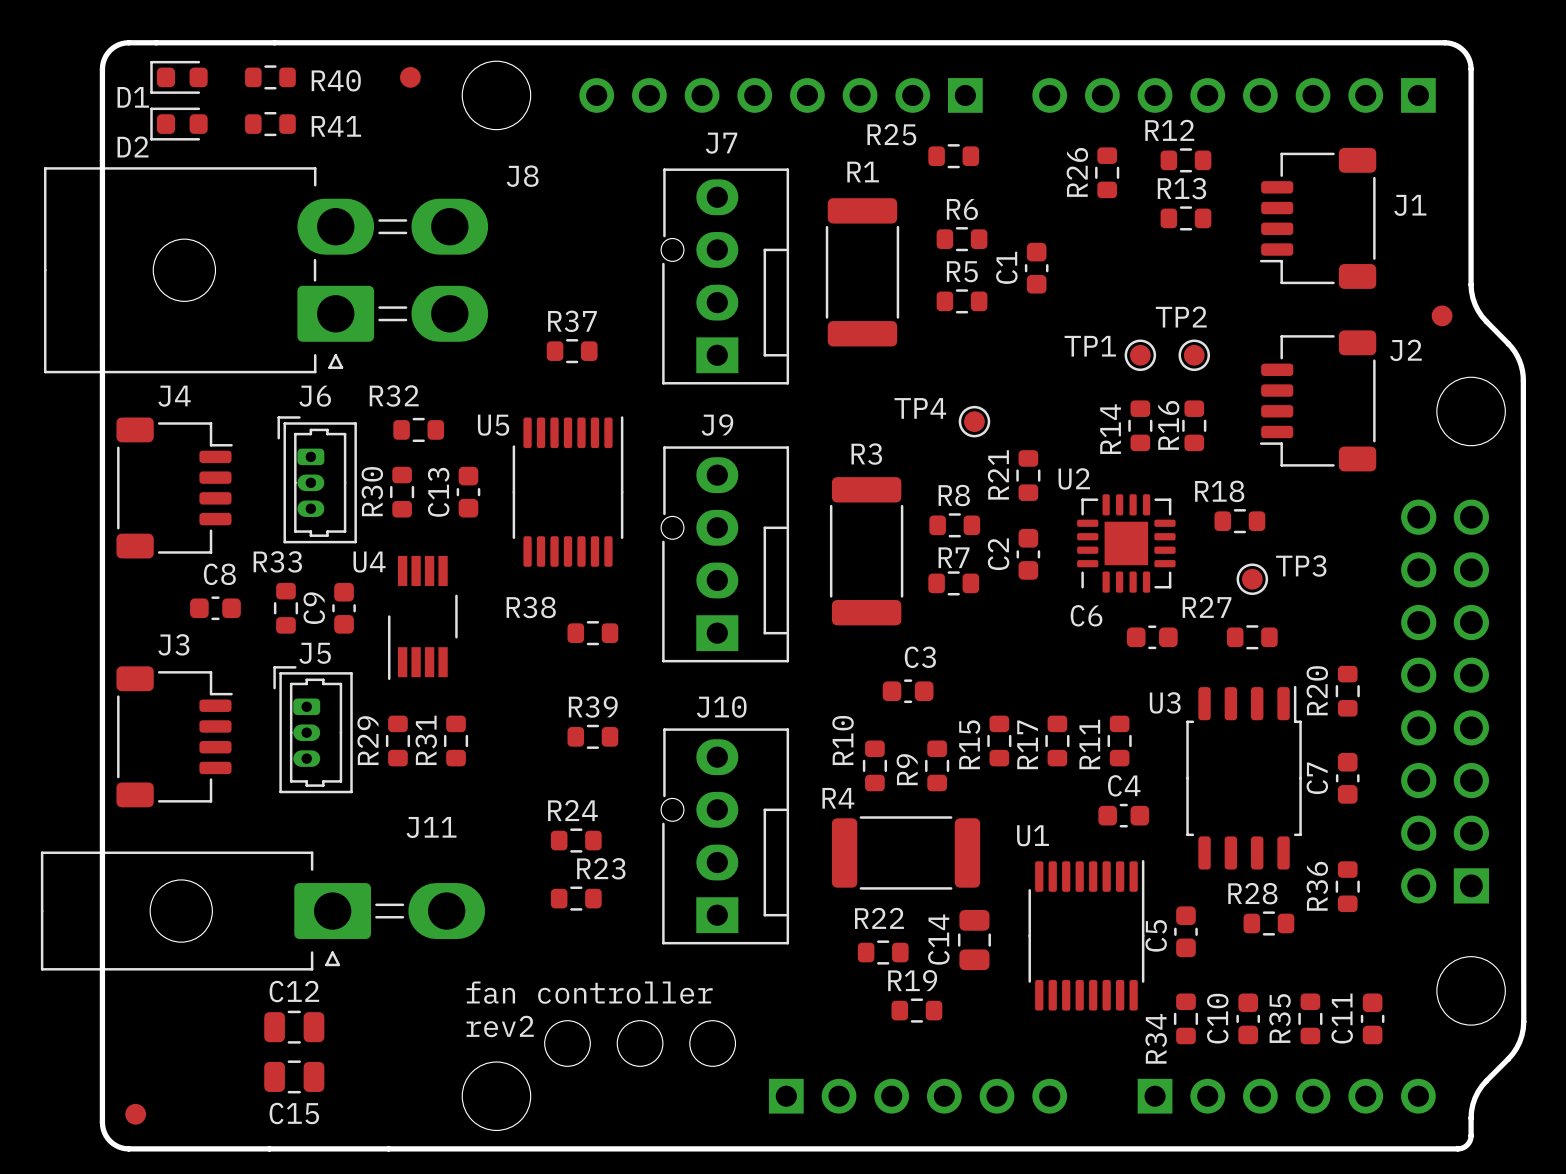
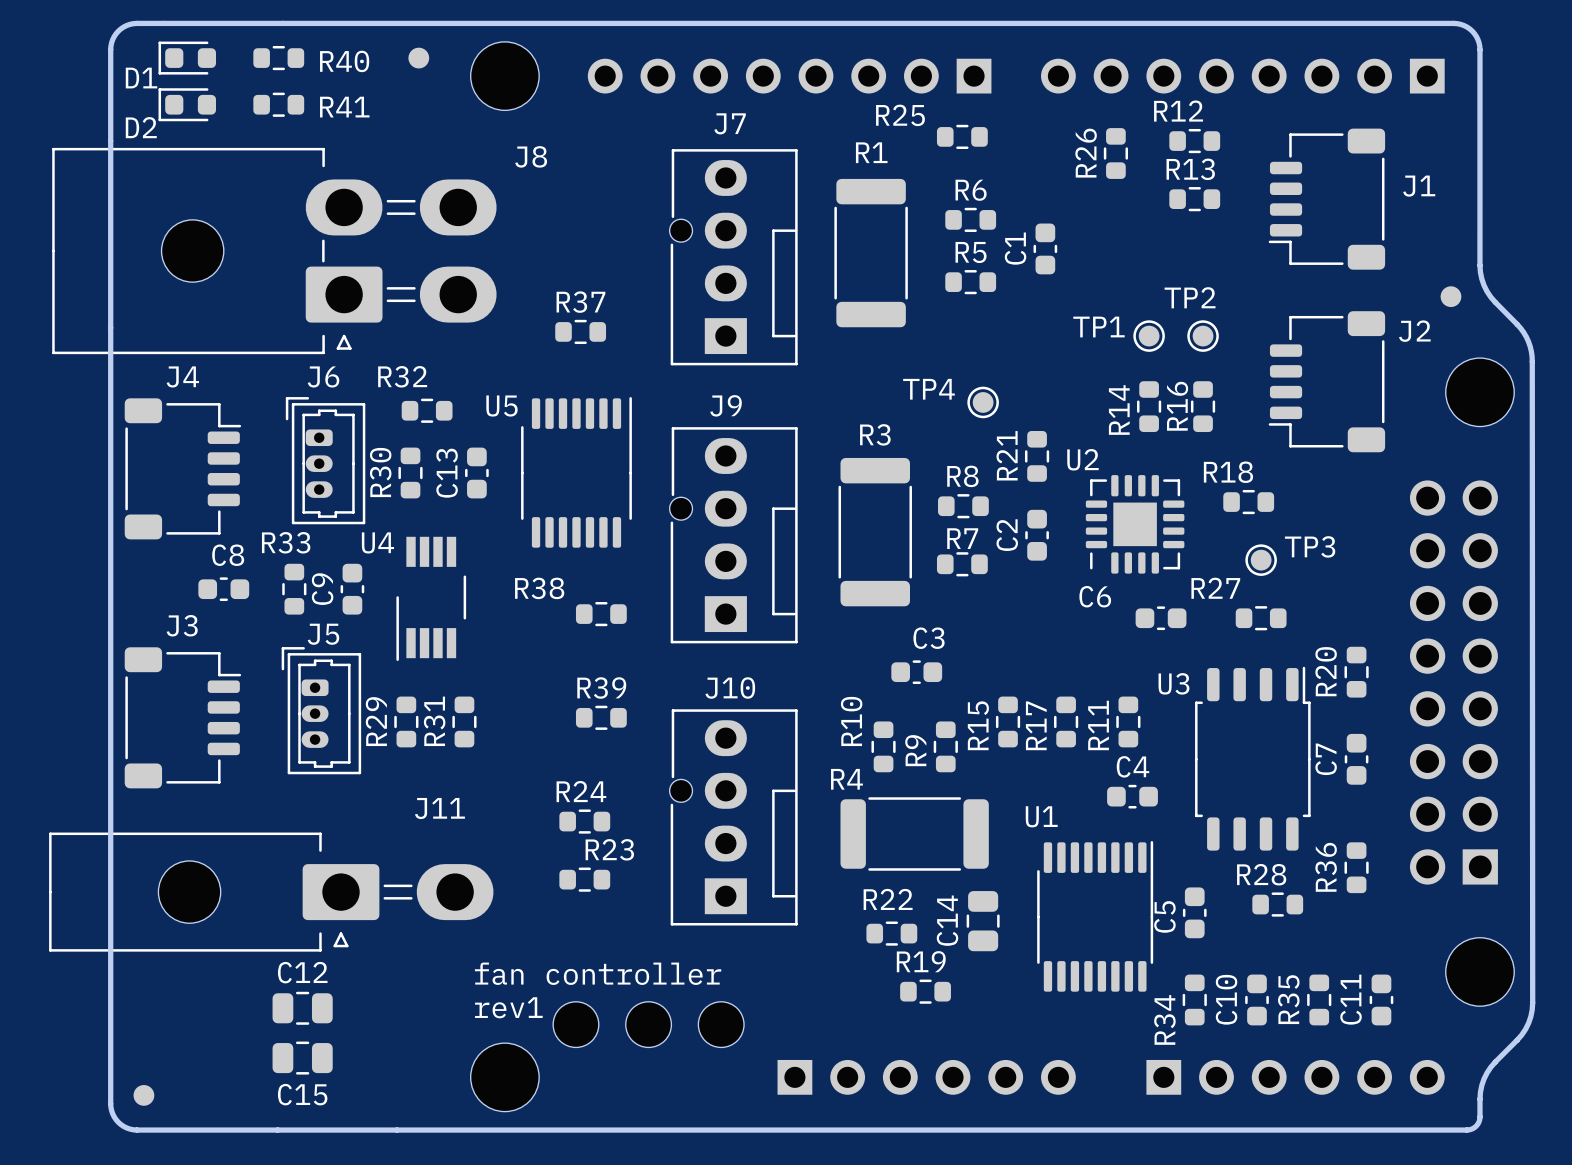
text: rev2 (500, 1026) -> rev1 (508, 1007)

